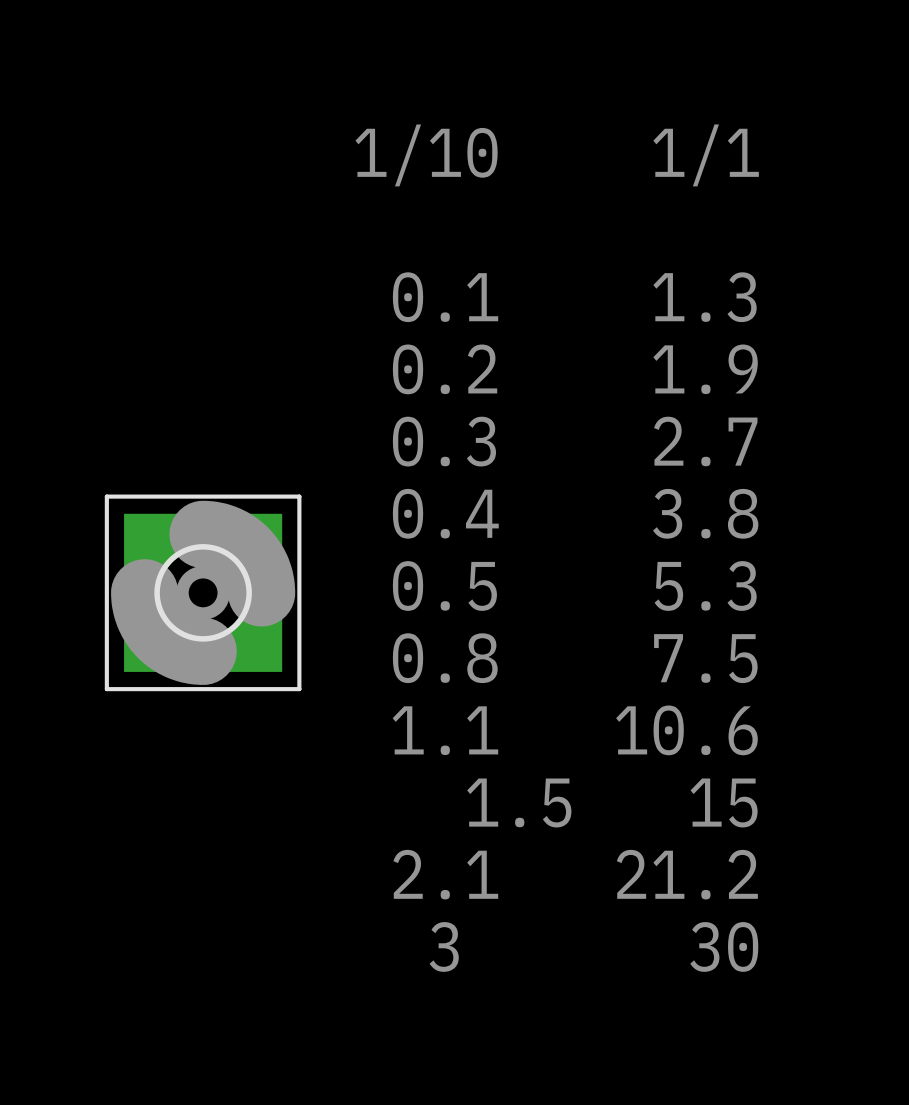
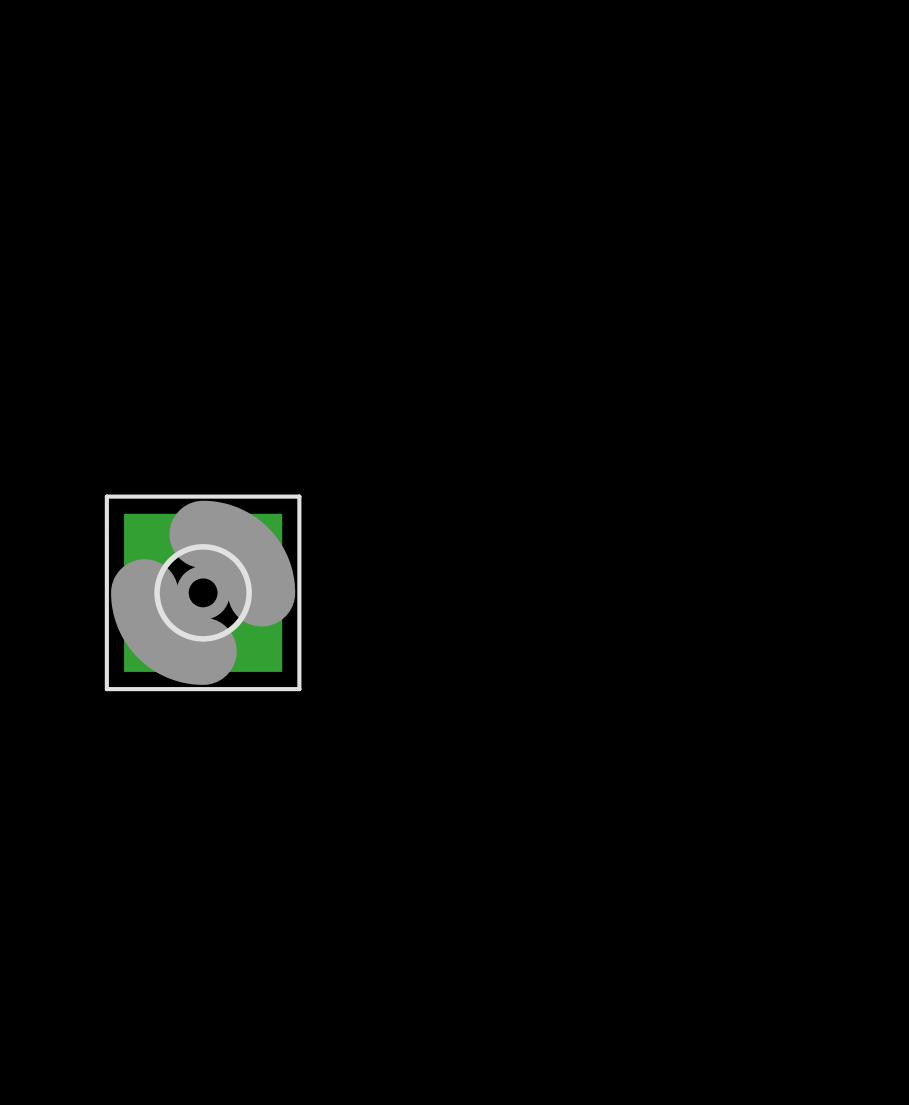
text: 1/10 1/1 (557, 155) -> none
text: 0.1 1.3 (574, 297) -> none
text: 0.2 1.9 (575, 369) -> none
text: 0.3 2.7 (575, 441) -> none
text: 0.4 3.8 (575, 513) -> none
text: 0.5 5.3 (574, 585) -> none
text: 0.8 7.5 (575, 658) -> none
text: 1.1 10.6 (575, 730) -> none
text: 1.5 15 (612, 802) -> none
text: 2.1 21.2 (575, 874) -> none
text: 3 30 (593, 946) -> none

